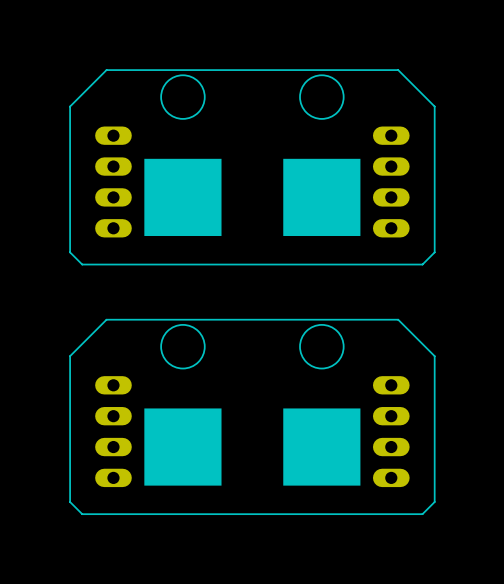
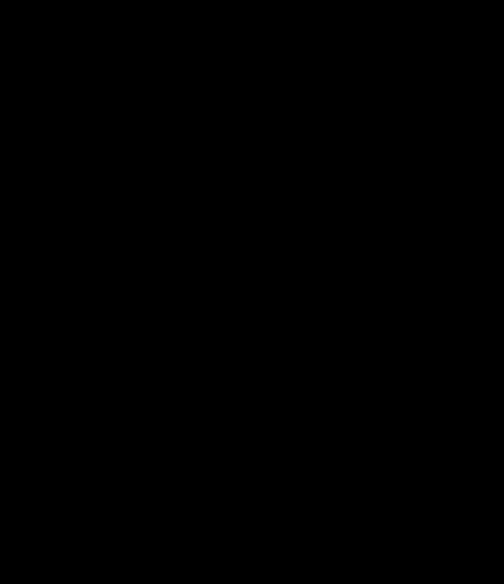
part: (252, 167) -> none
part: (252, 416) -> none

